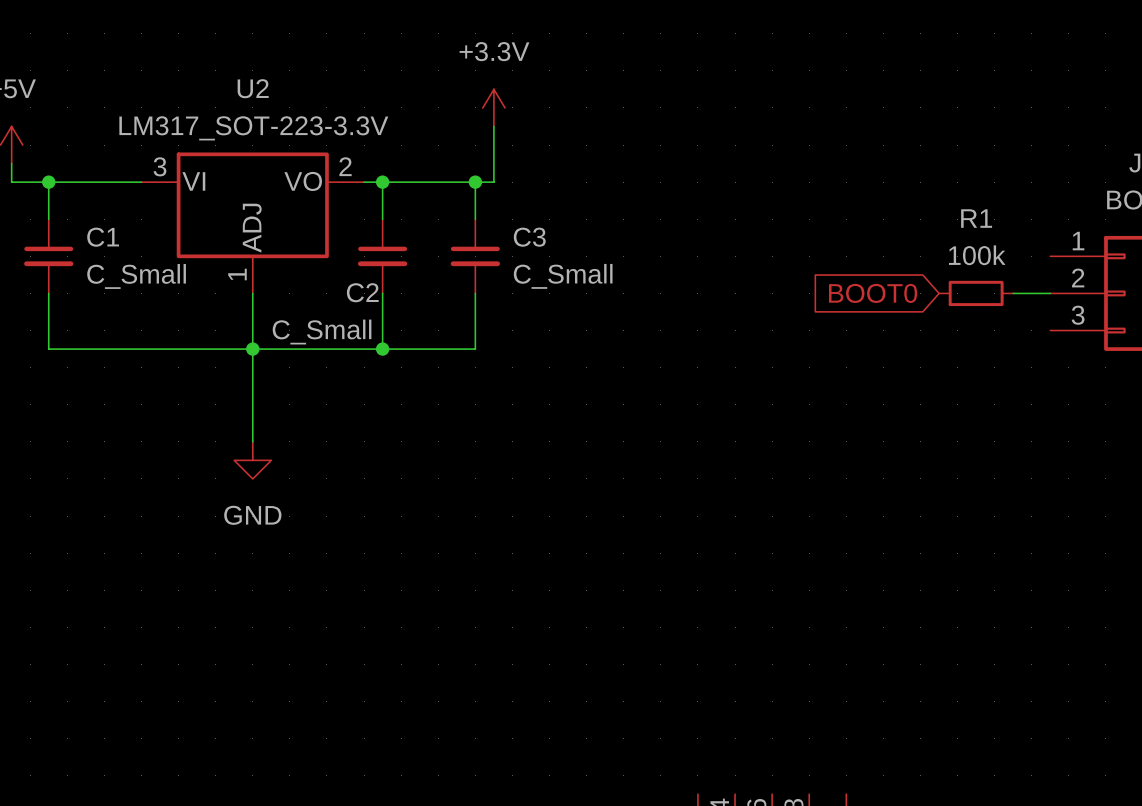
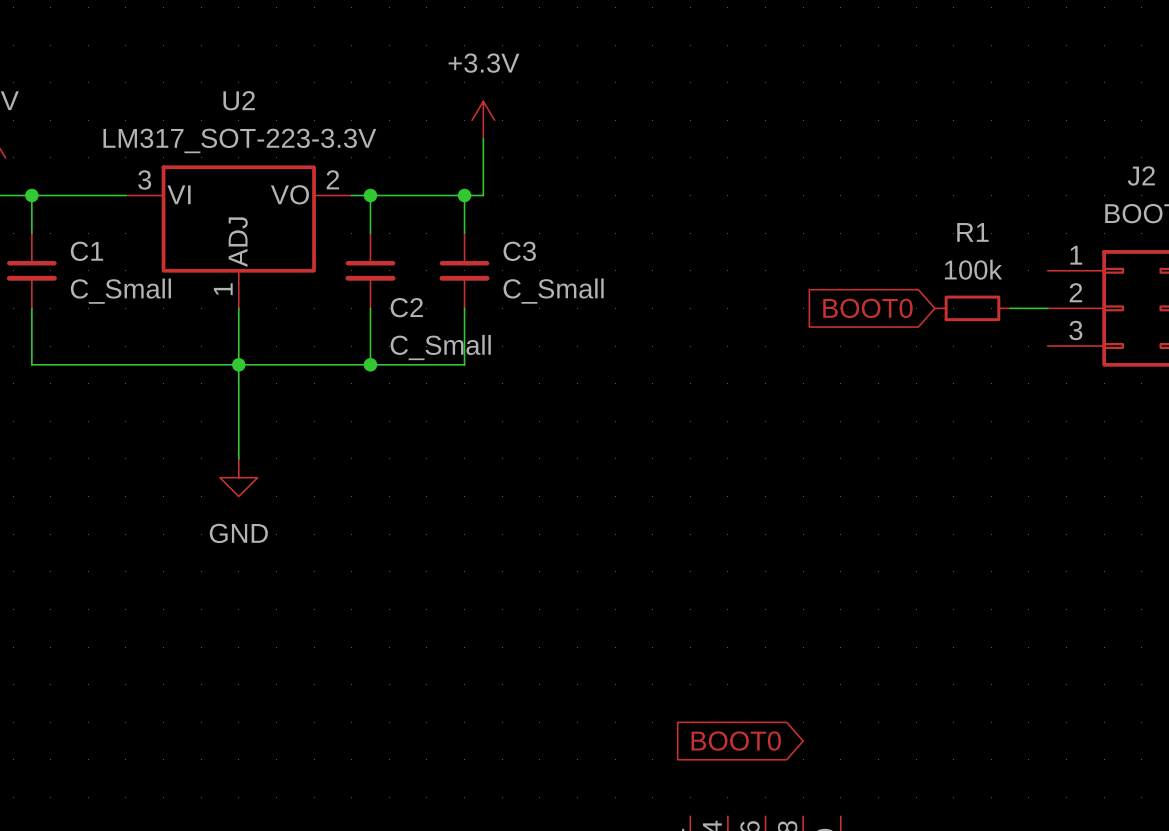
C2 name position: C2 (362, 292) -> C2 (406, 307)
C2 value position: C_Small (322, 332) -> C_Small (440, 347)
global label: none -> BOOT0 (736, 741)

